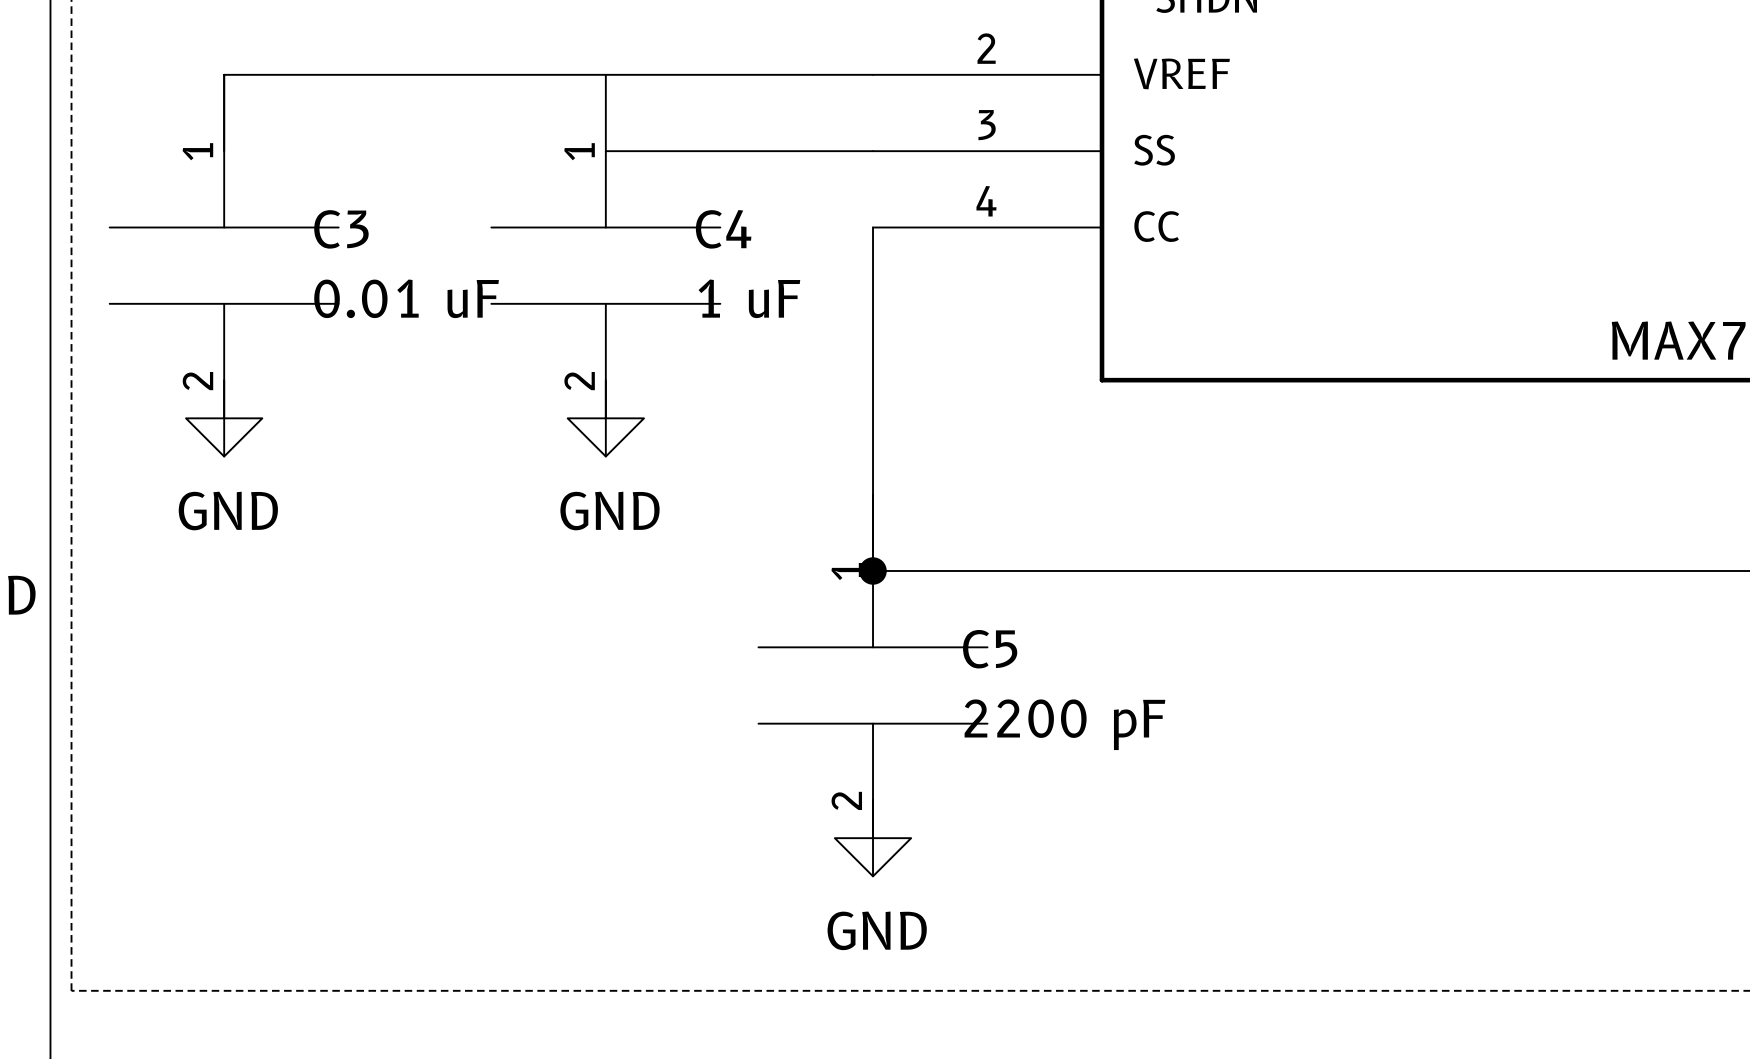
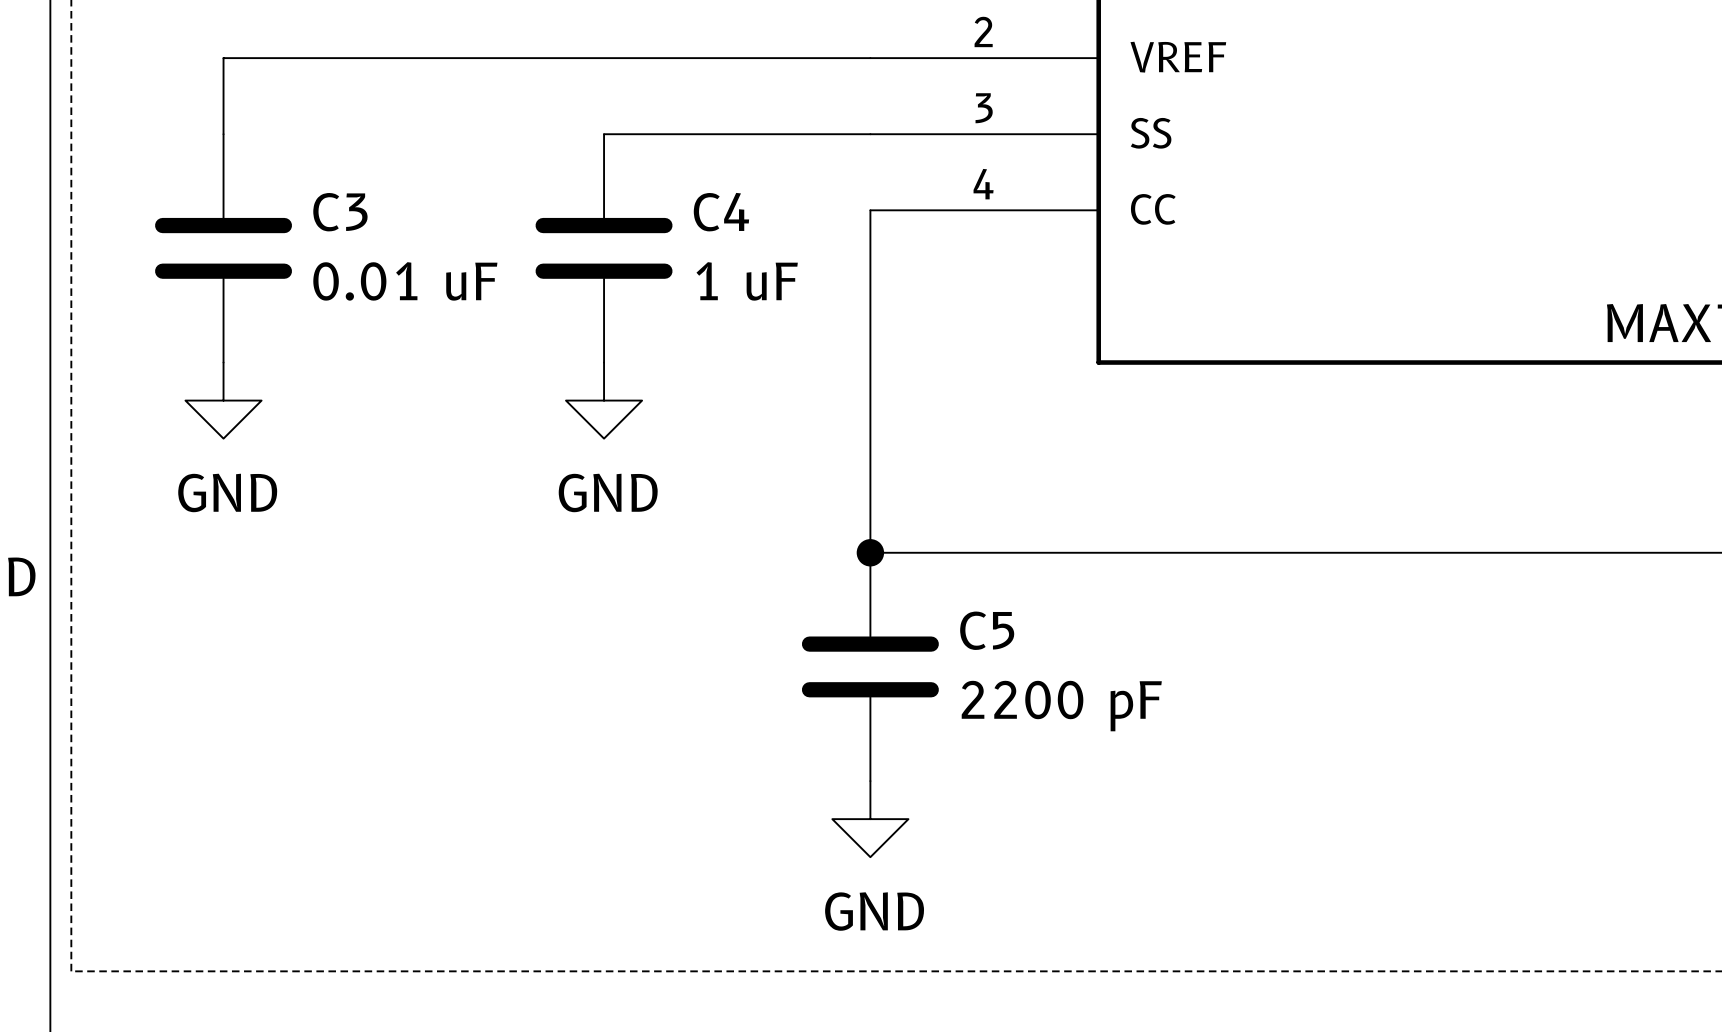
C3 symbol: [109, 74, 339, 457] -> [155, 134, 293, 363]
C4 symbol: [491, 74, 721, 457] -> [535, 134, 673, 363]
C5 symbol: [758, 494, 988, 877] -> [801, 552, 939, 782]

